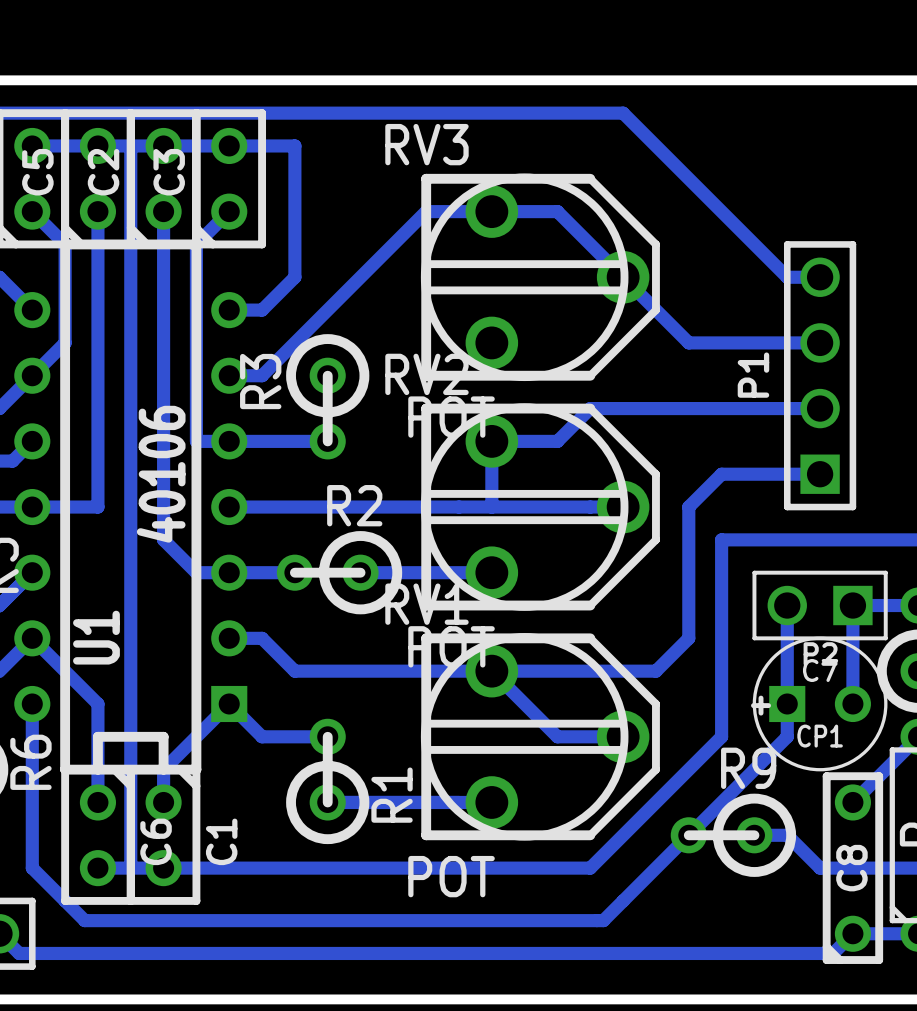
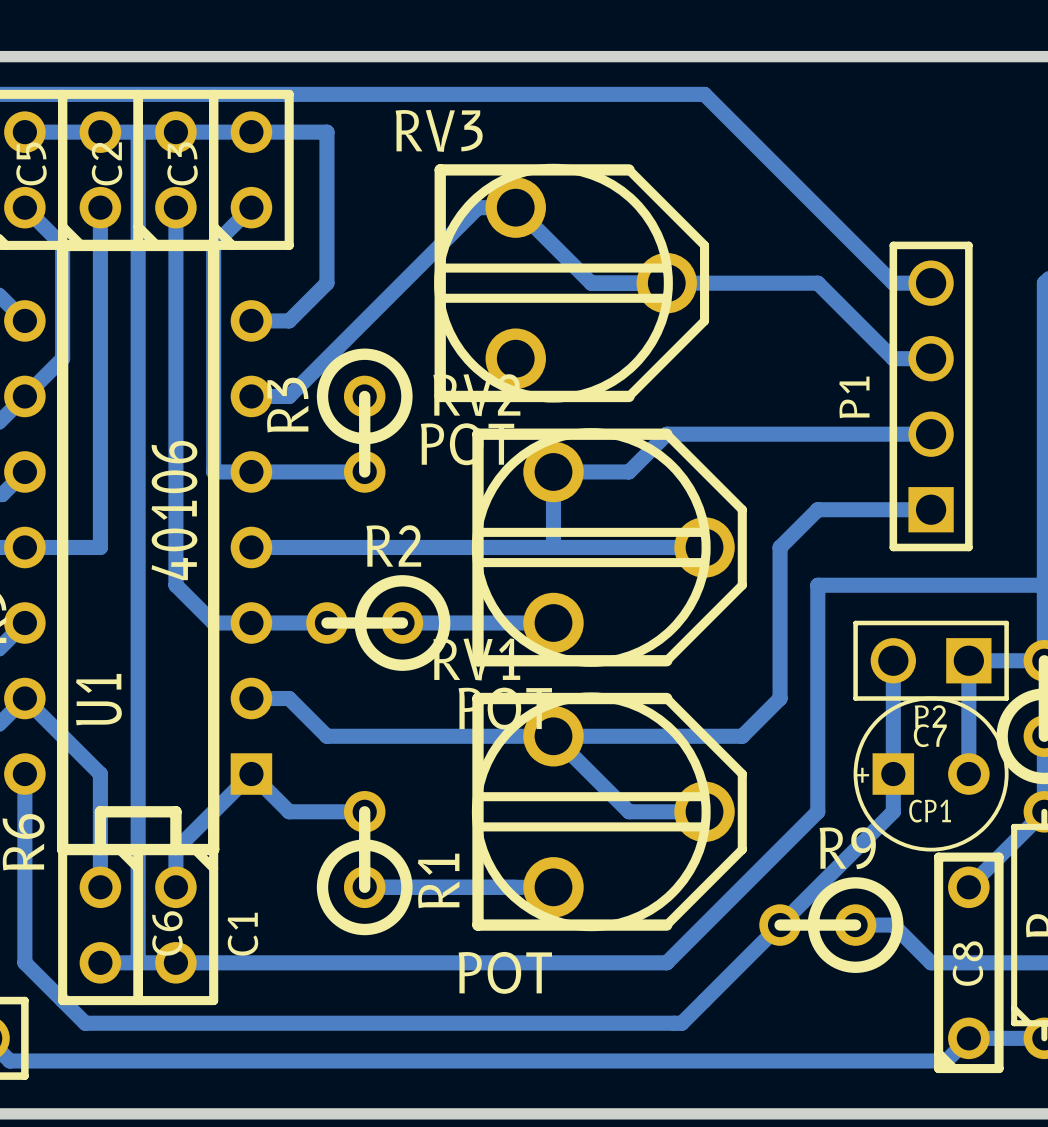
bottom track: (459, 211) (557, 211) (688, 342) (787, 342) -> (515, 207) (591, 283) (817, 283) (893, 358)
RV3 position: (540, 277) -> (571, 283)

